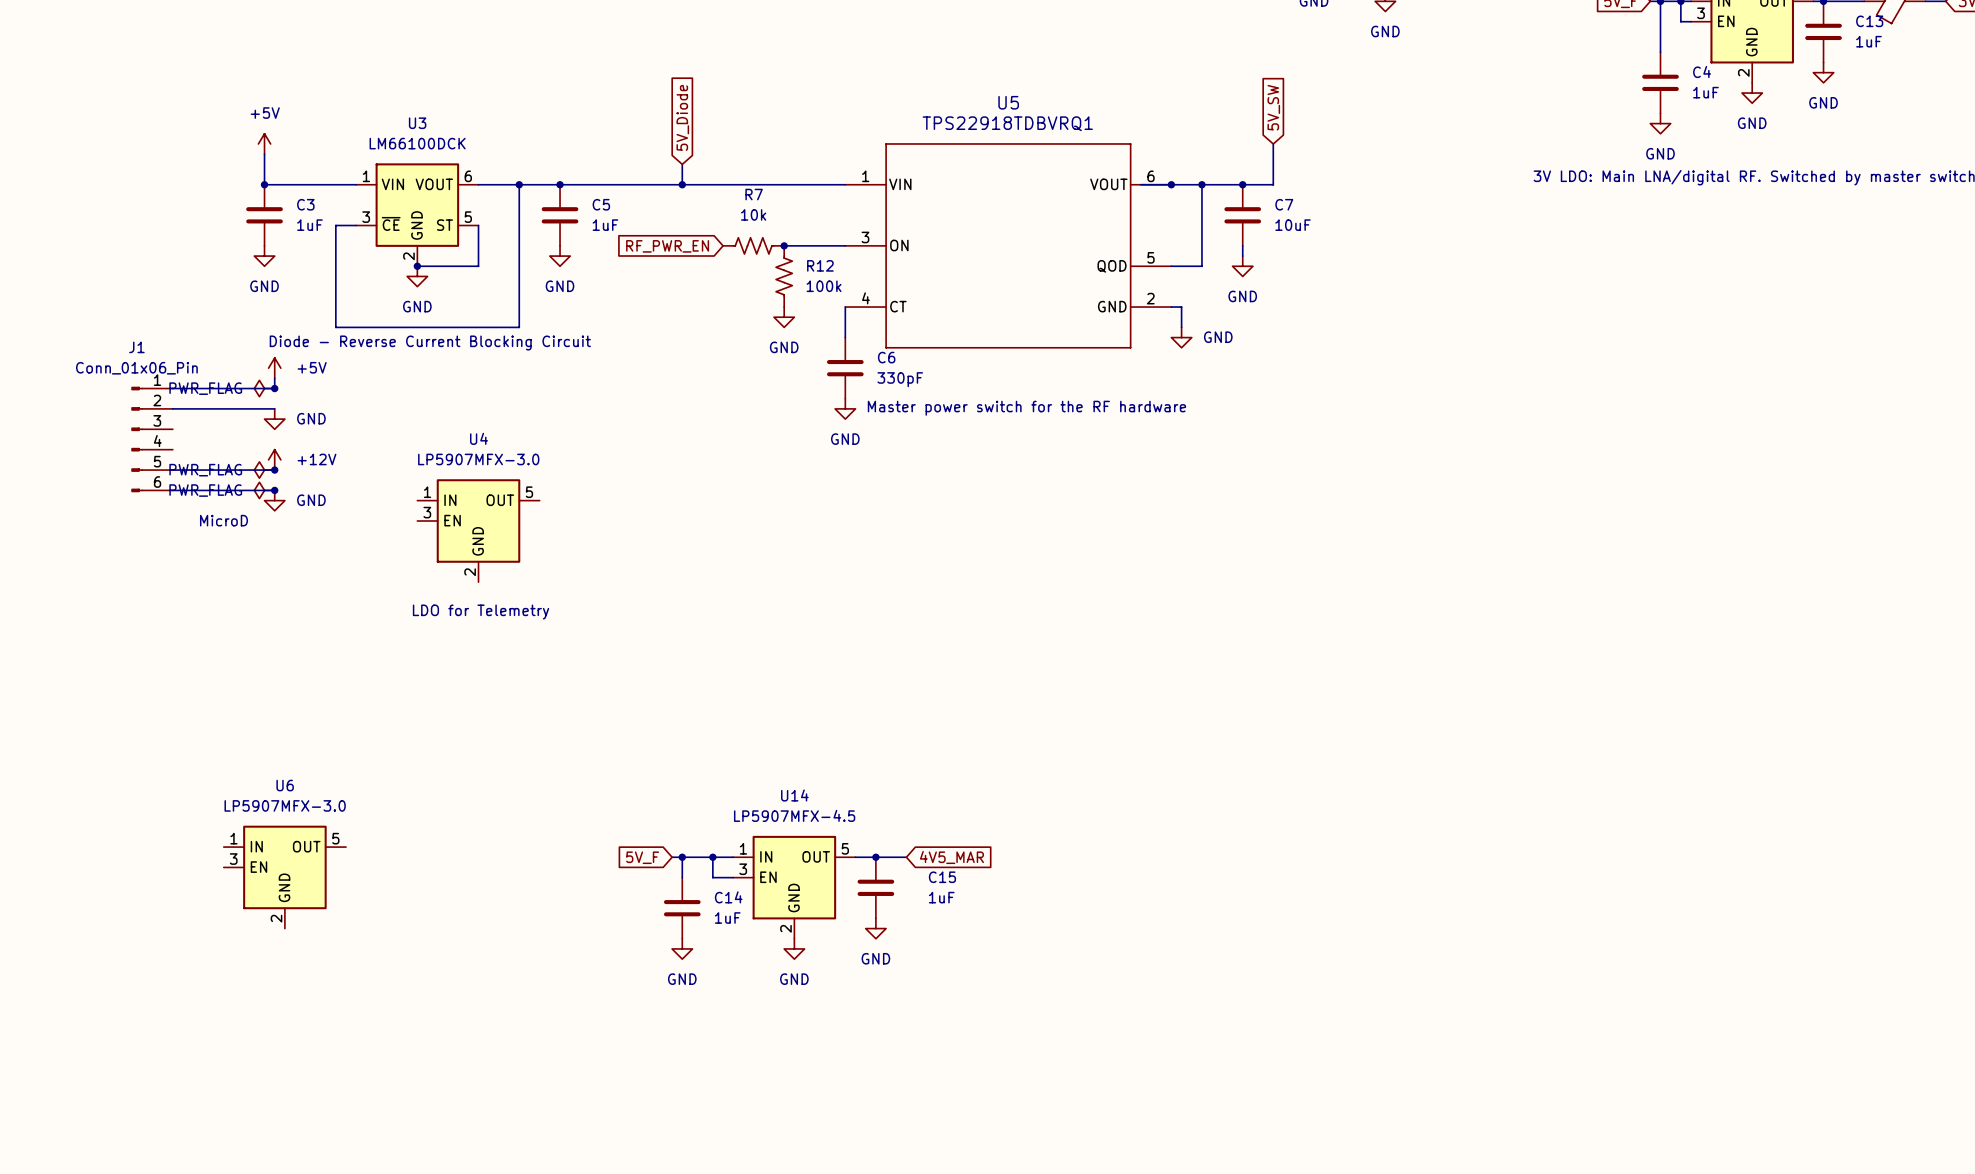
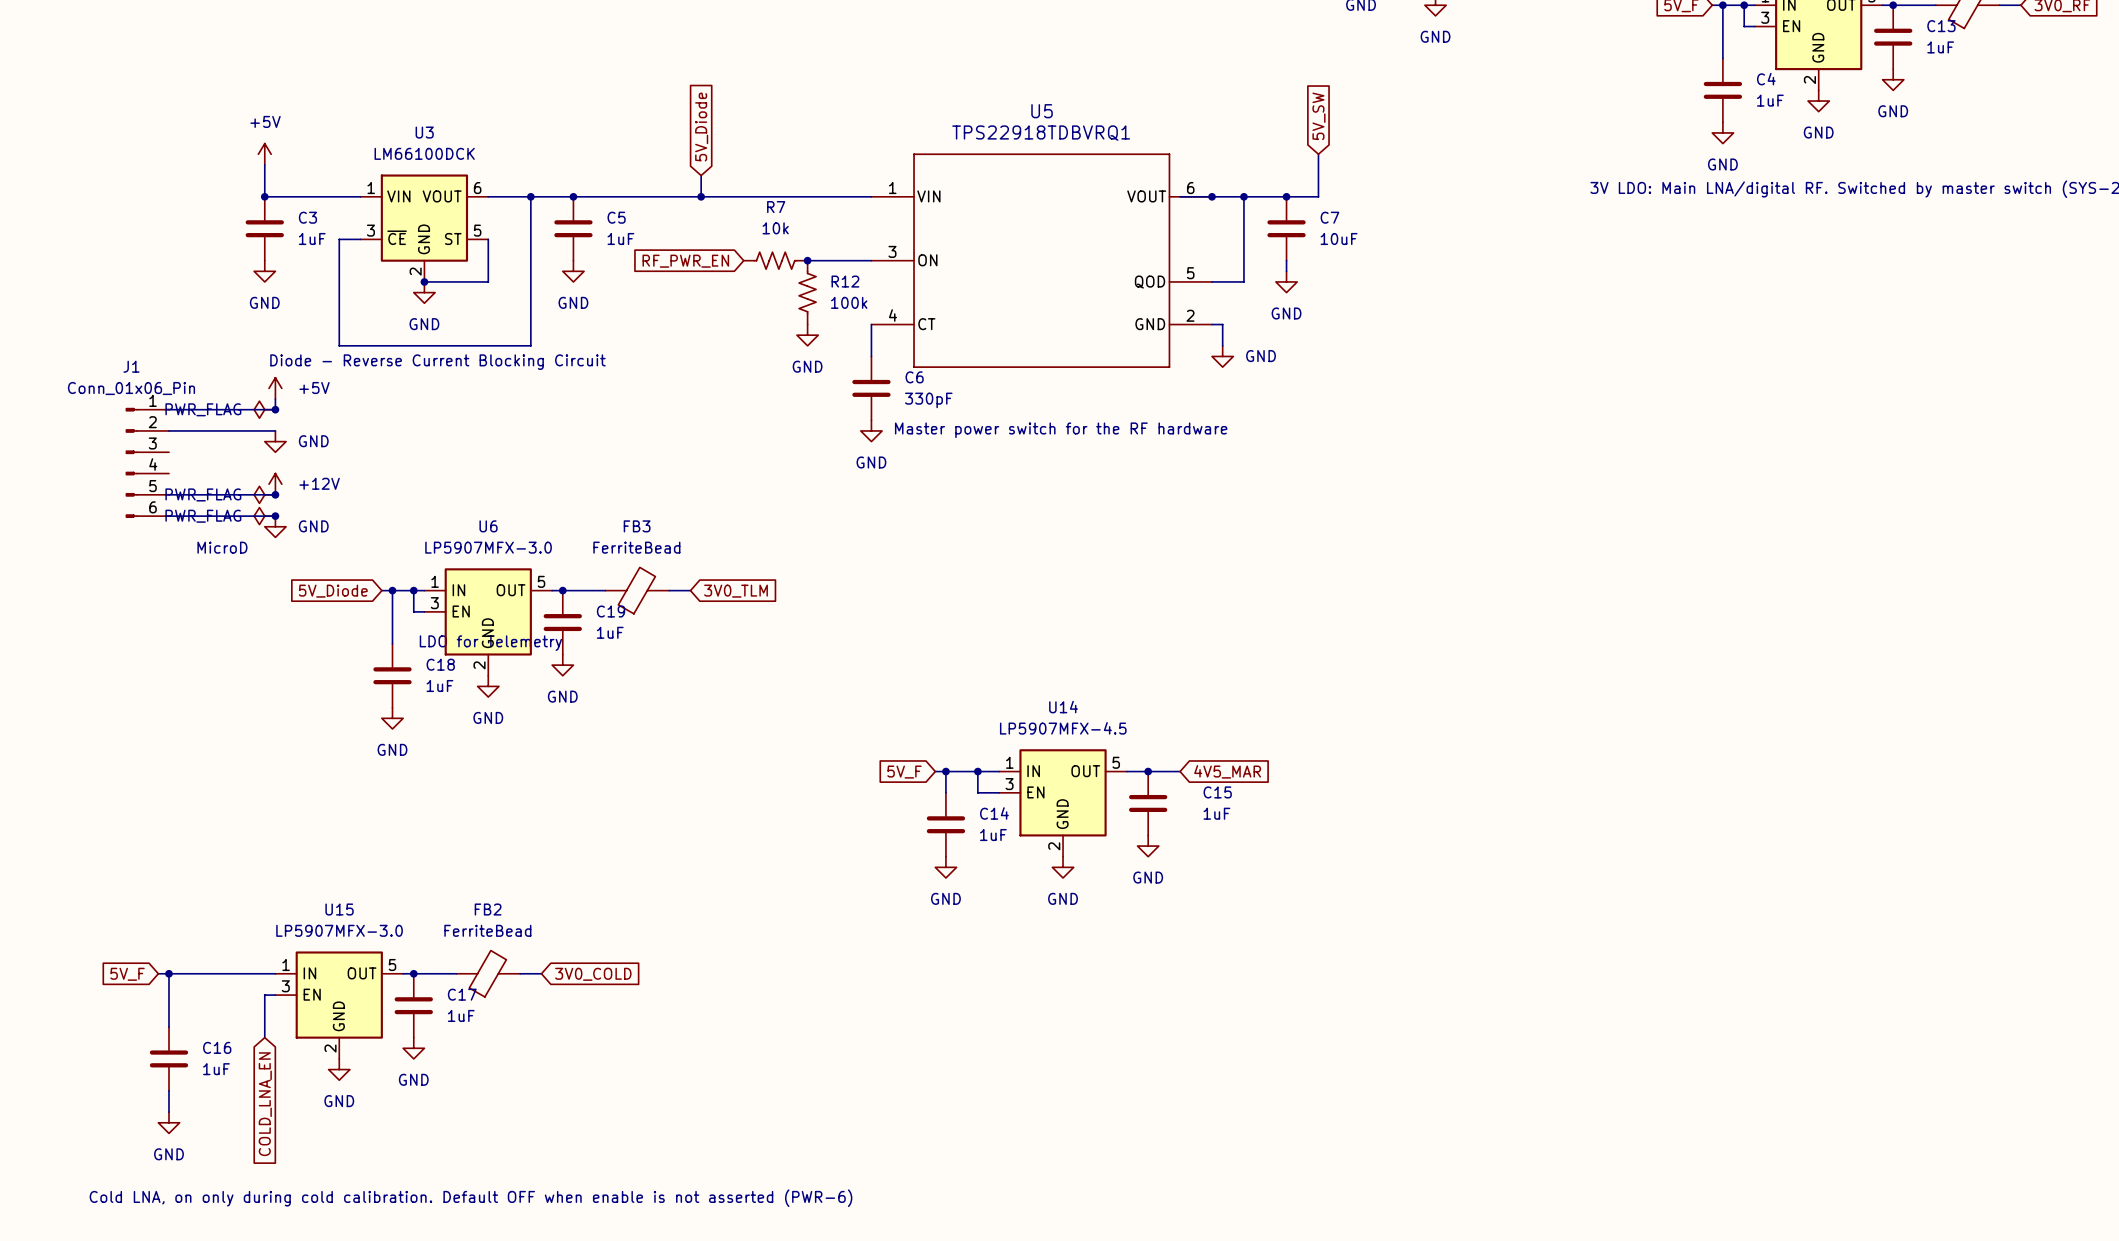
U4: LP5907MFX-3.0 (478, 530) -> none
wire: none -> (381, 590) (424, 590)
wire: none -> (392, 590) (392, 643)
junction: none -> (392, 590)
wire: none -> (413, 590) (413, 611) (424, 611)
junction: none -> (413, 590)
wire: none -> (552, 590) (605, 590)
junction: none -> (562, 590)
FB3: none -> FerriteBead (637, 590)
wire: none -> (669, 590) (690, 590)
global label: none -> 5V_Diode (333, 591)
global label: none -> 3V0_TLM (736, 591)
C19: none -> 1uF (562, 622)
power symbol: none -> GND (562, 665)
C18: none -> 1uF (392, 675)
power symbol: none -> GND (488, 686)
power symbol: none -> GND (392, 718)
wire: none -> (935, 771) (999, 771)
wire: none -> (945, 771) (945, 792)
junction: none -> (945, 771)
wire: none -> (977, 771) (977, 792) (999, 792)
junction: none -> (977, 771)
wire: none -> (1126, 771) (1180, 771)
junction: none -> (1148, 771)
global label: none -> 5V_F (904, 772)
global label: none -> 4V5_MAR (1227, 771)
power symbol: none -> GND (1148, 846)
power symbol: none -> GND (945, 867)
power symbol: none -> GND (1063, 867)
global label: 5V_F (642, 857) -> none
wire: (672, 857) (733, 857) -> none
wire: (682, 857) (682, 877) -> none
junction: (682, 857) -> none
wire: (712, 857) (712, 877) (733, 877) -> none
junction: (712, 857) -> none
wire: (855, 857) (906, 857) -> none
junction: (875, 857) -> none
global label: 4V5_MAR (951, 857) -> none
U6 position: (284, 877) -> (488, 622)
U14 position: (794, 887) -> (1063, 802)
C15 position: (875, 887) -> (1148, 803)
C14 position: (682, 908) -> (945, 824)
wire: none -> (158, 973) (275, 973)
wire: none -> (168, 973) (168, 1027)
junction: none -> (168, 973)
wire: none -> (403, 973) (456, 973)
junction: none -> (413, 973)
FB2: none -> FerriteBead (488, 973)
wire: none -> (520, 973) (541, 973)
power symbol: GND (875, 928) -> none
global label: none -> 5V_F (127, 974)
global label: none -> 3V0_COLD (593, 974)
wire: none -> (275, 995) (264, 995) (264, 1037)
power symbol: GND (682, 948) -> none
power symbol: GND (794, 948) -> none
U15: none -> LP5907MFX-3.0 (339, 1005)
C17: none -> 1uF (413, 1005)
power symbol: none -> GND (413, 1048)
C16: none -> 1uF (168, 1058)
power symbol: none -> GND (339, 1069)
wire: none -> (168, 1090) (168, 1112)
global label: none -> COLD_LNA_EN (265, 1104)
power symbol: none -> GND (168, 1122)
text: none -> Cold LNA, on only during cold calibration. Default OFF when enable is not asserted (PWR-6) (471, 1198)

